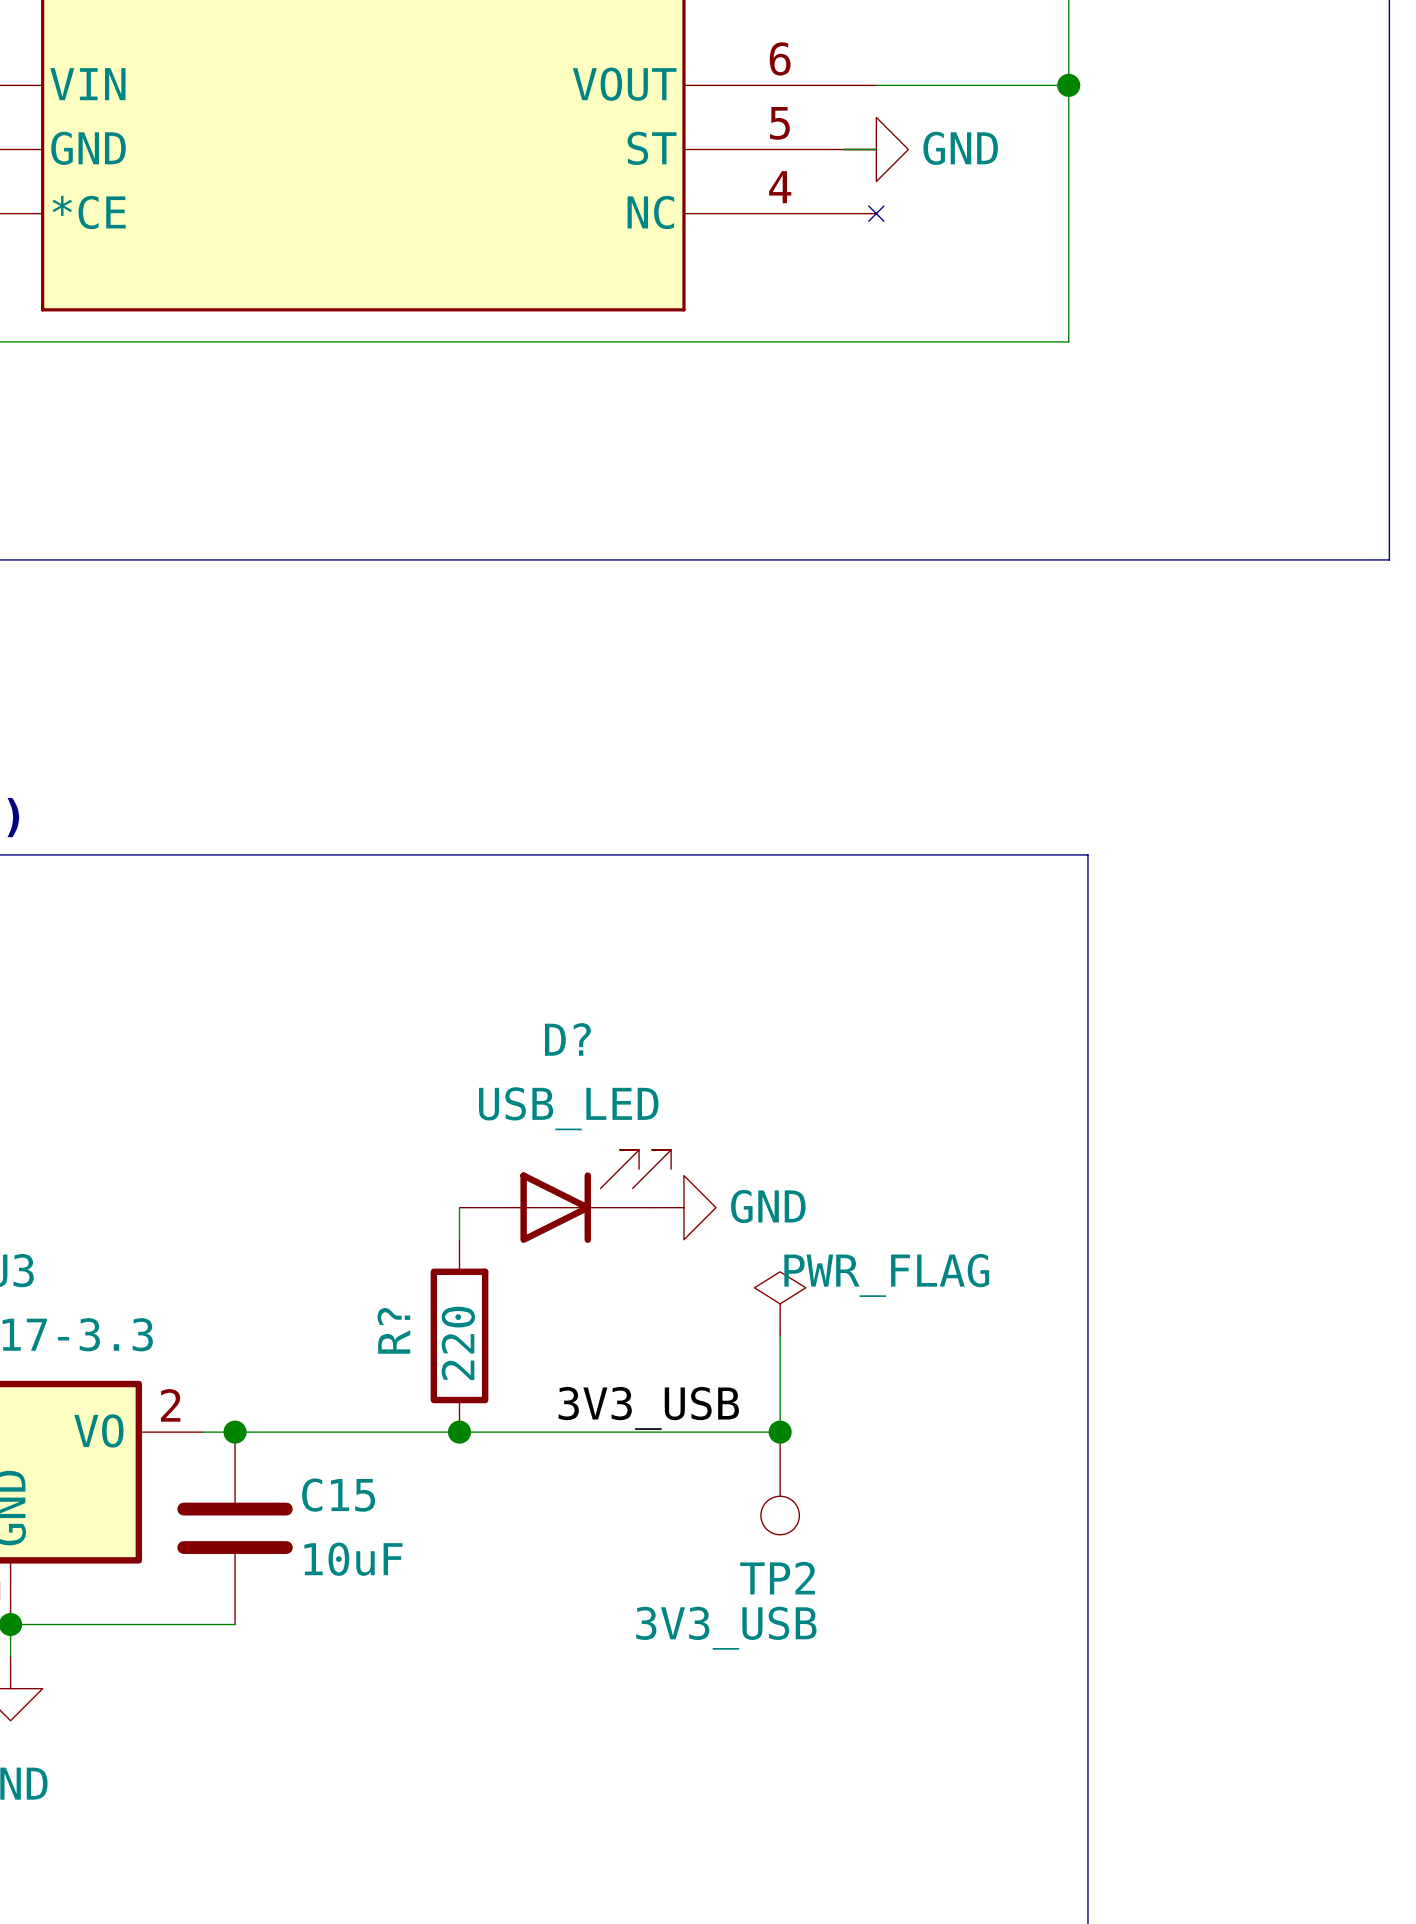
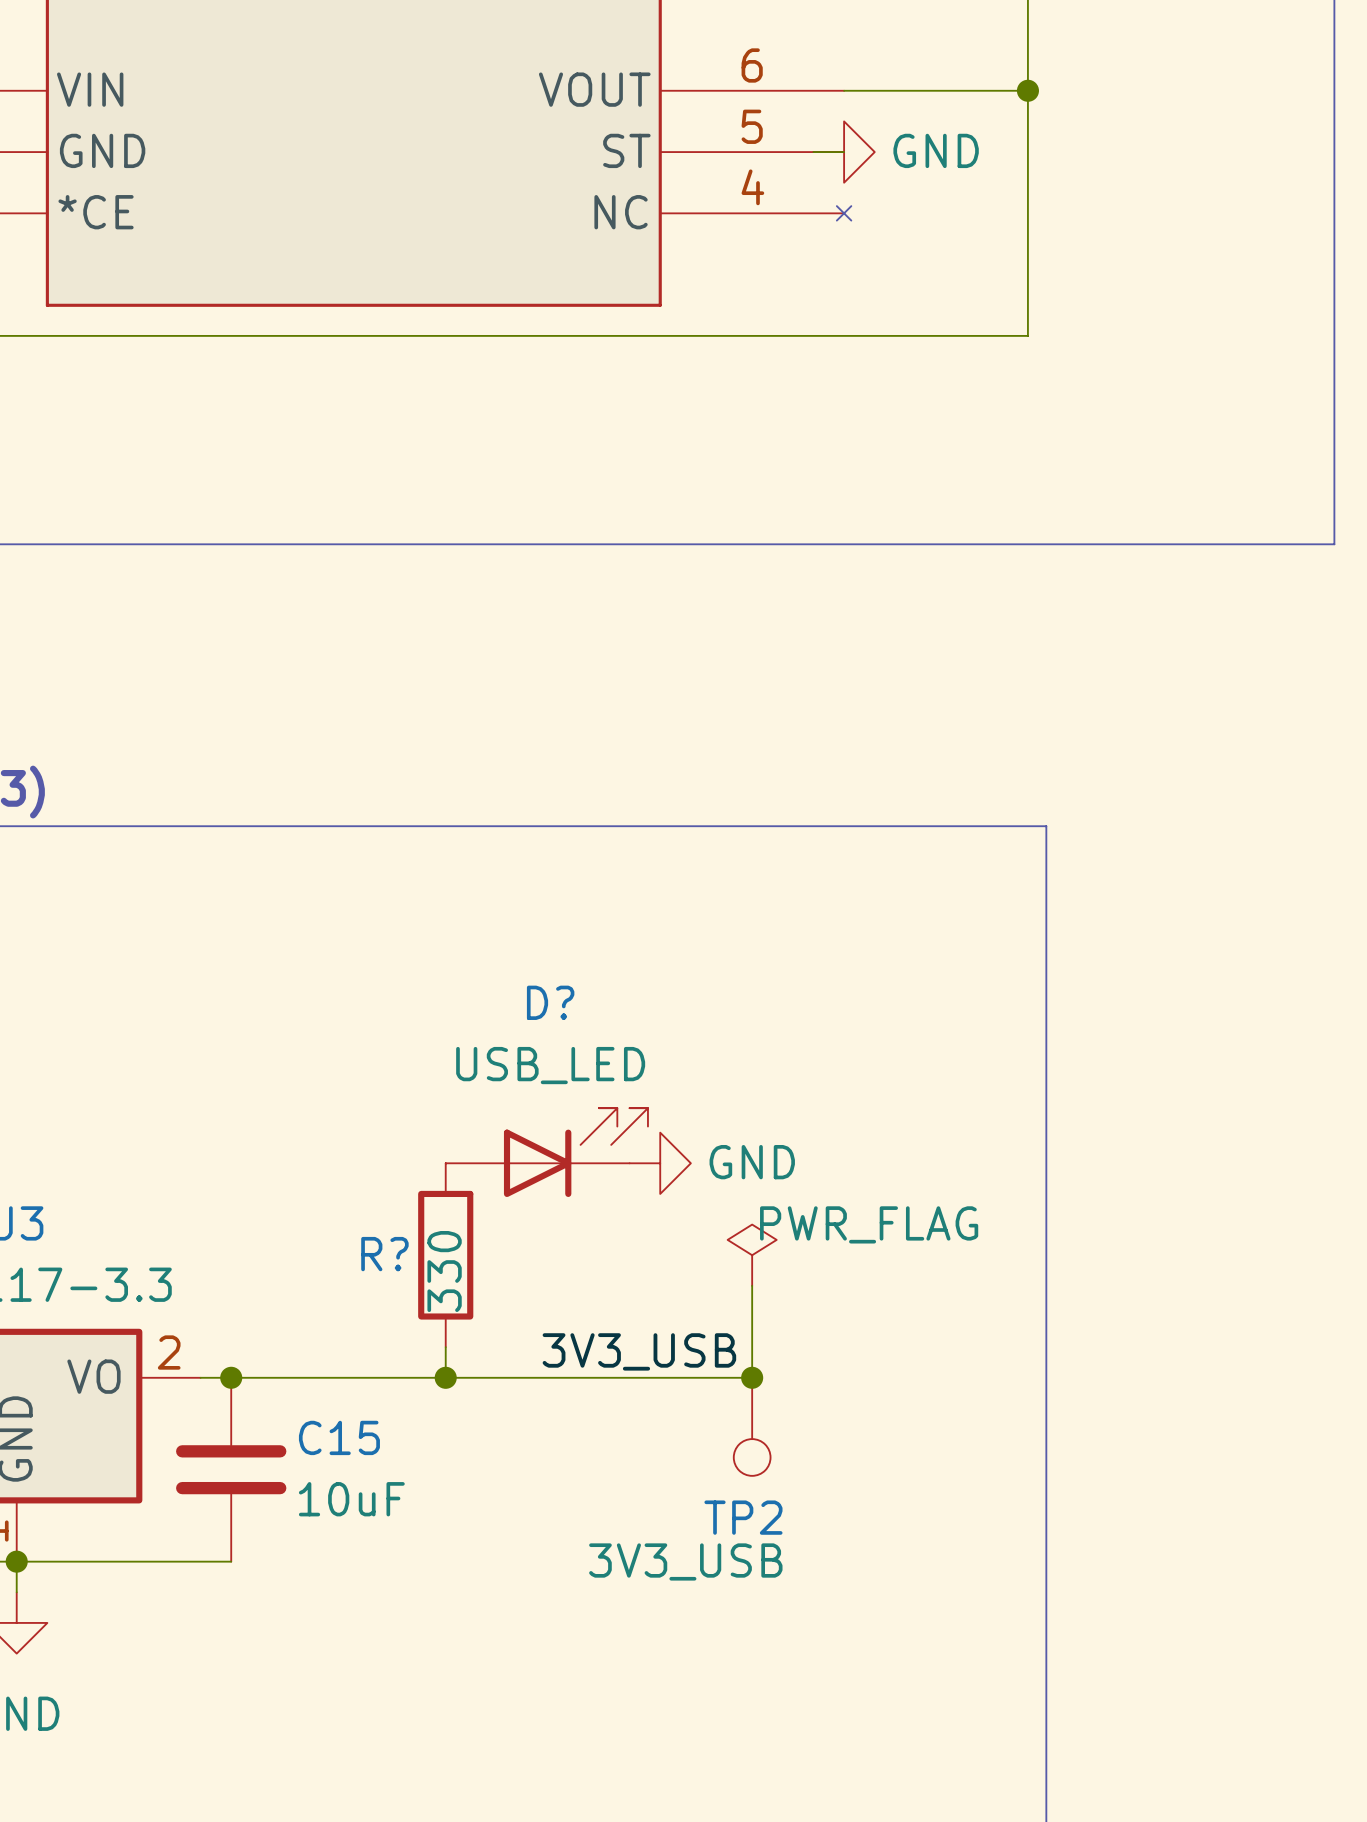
R?: none -> 330 (445, 1255)
R?: 220 (459, 1335) -> none

